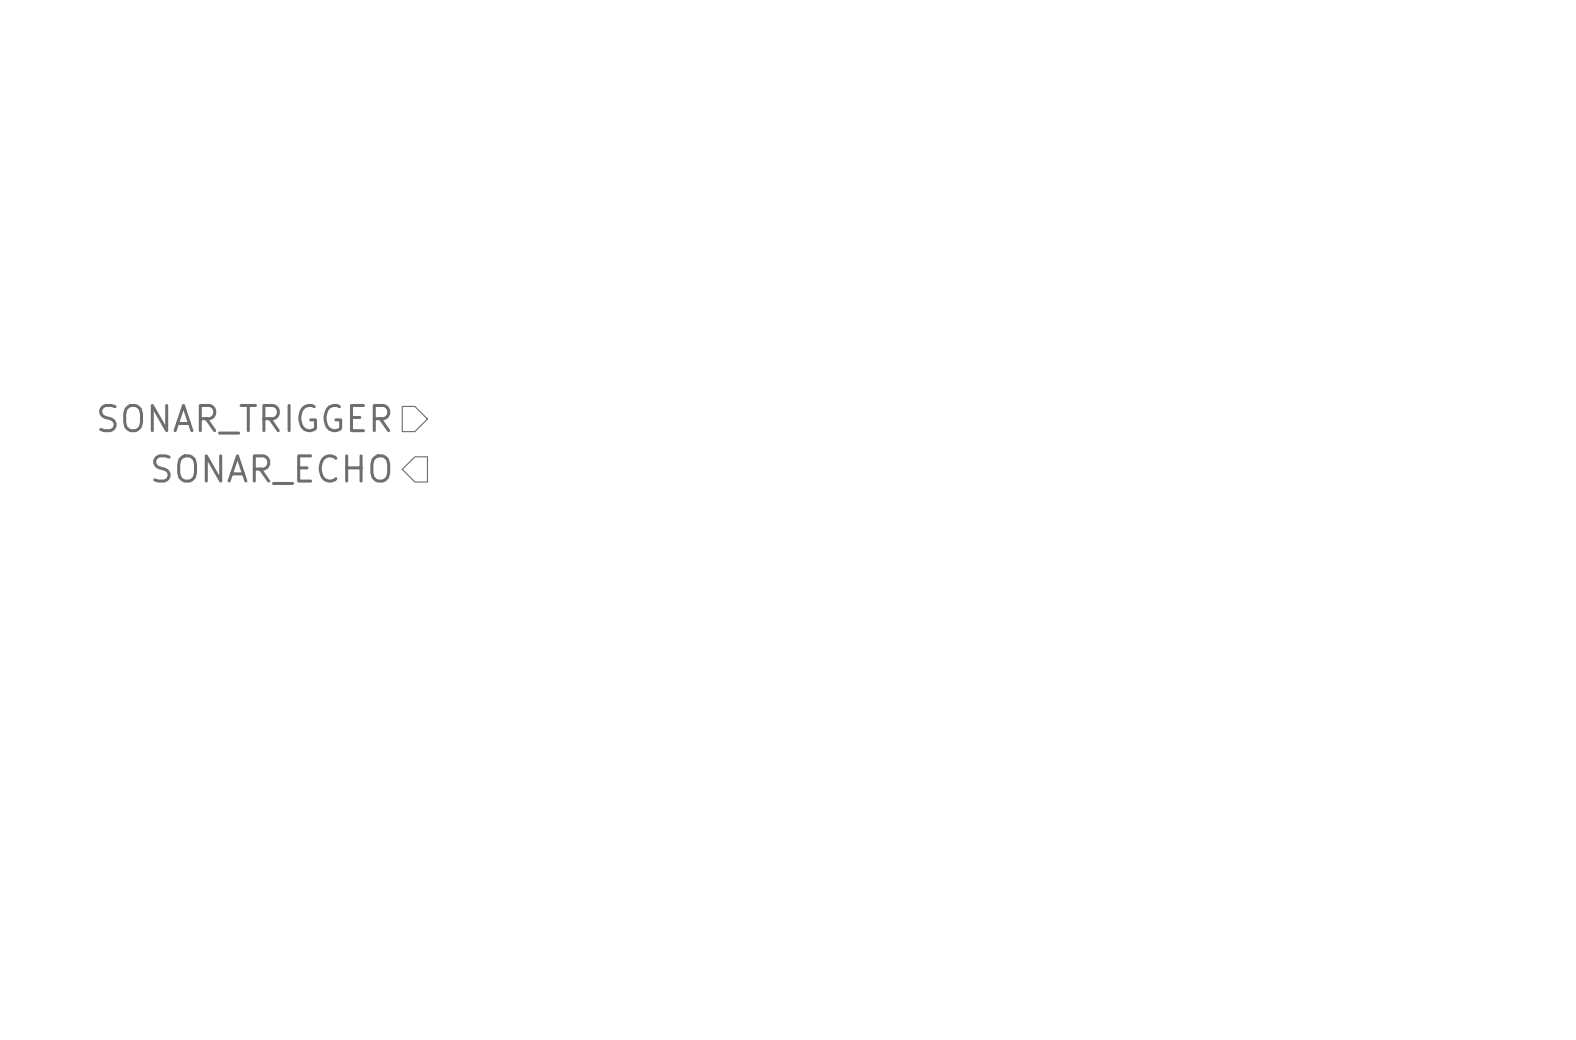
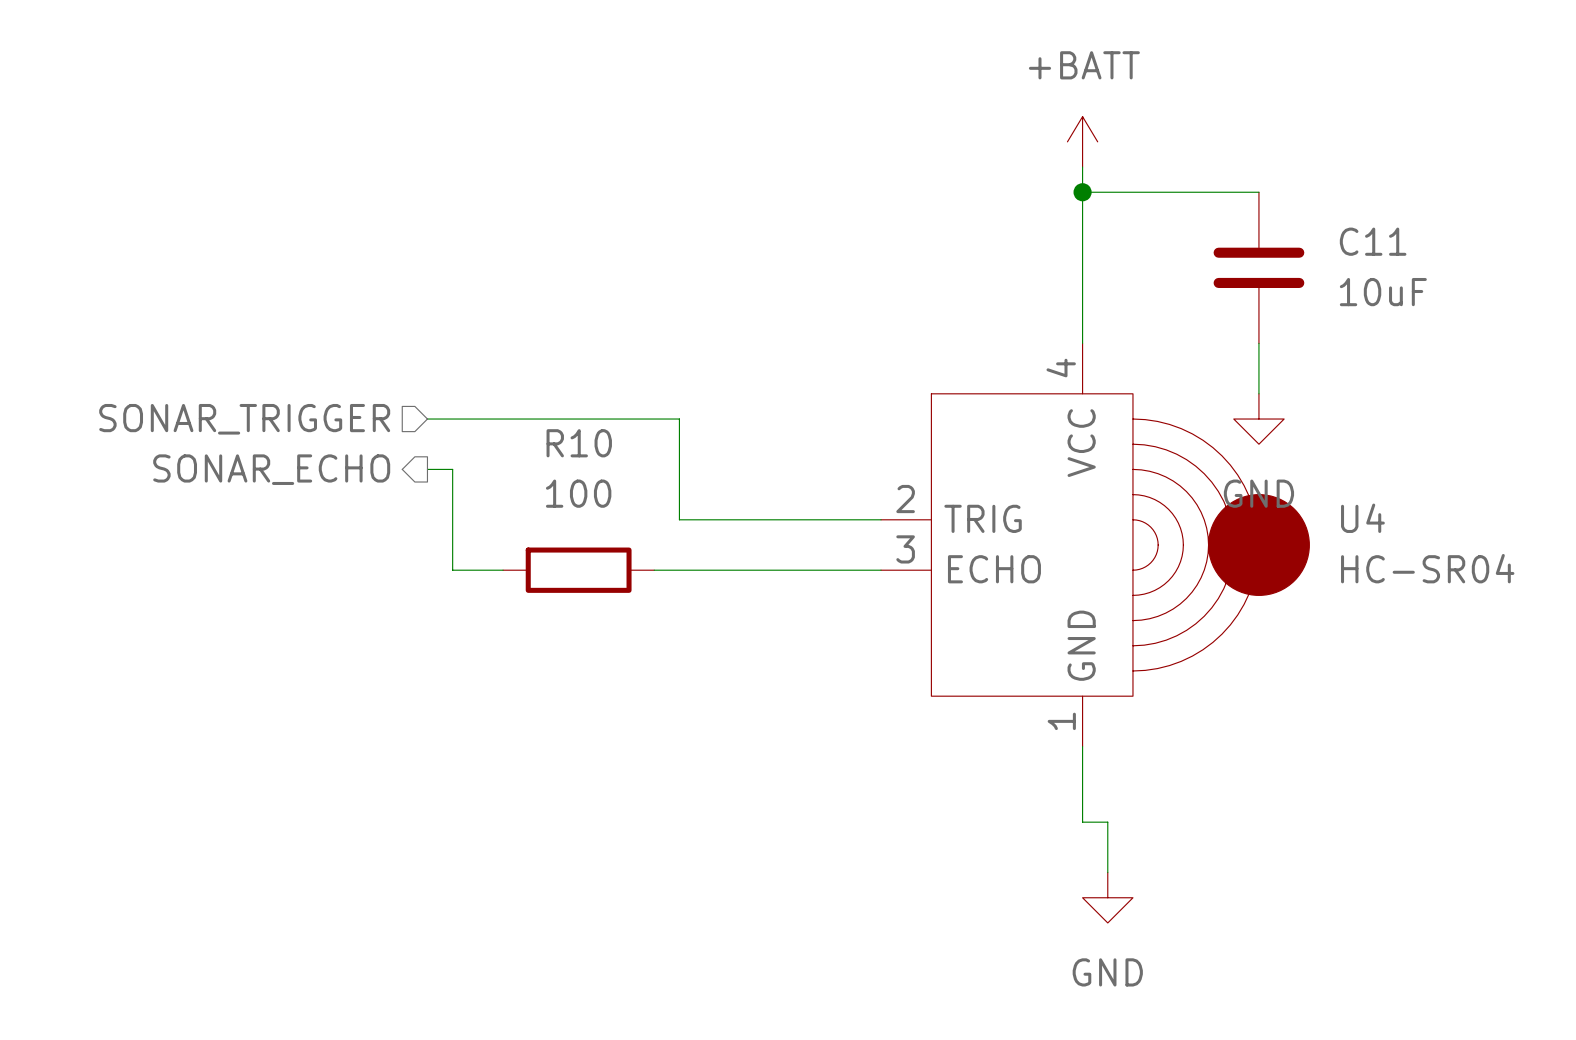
power symbol: none -> +BATT (1082, 141)
wire: none -> (1082, 167) (1082, 343)
wire: none -> (1082, 192) (1258, 192)
junction: none -> (1082, 192)
C11: none -> 10uF (1258, 267)
wire: none -> (1258, 343) (1258, 393)
wire: none -> (427, 419) (679, 419) (679, 519) (881, 519)
power symbol: none -> GND (1258, 419)
wire: none -> (427, 469) (452, 469) (452, 570) (503, 570)
U4: none -> HC-SR04 (1095, 545)
R10: none -> 100 (578, 570)
wire: none -> (654, 570) (881, 570)
wire: none -> (1082, 746) (1082, 822) (1107, 822) (1107, 872)
power symbol: none -> GND (1107, 897)

